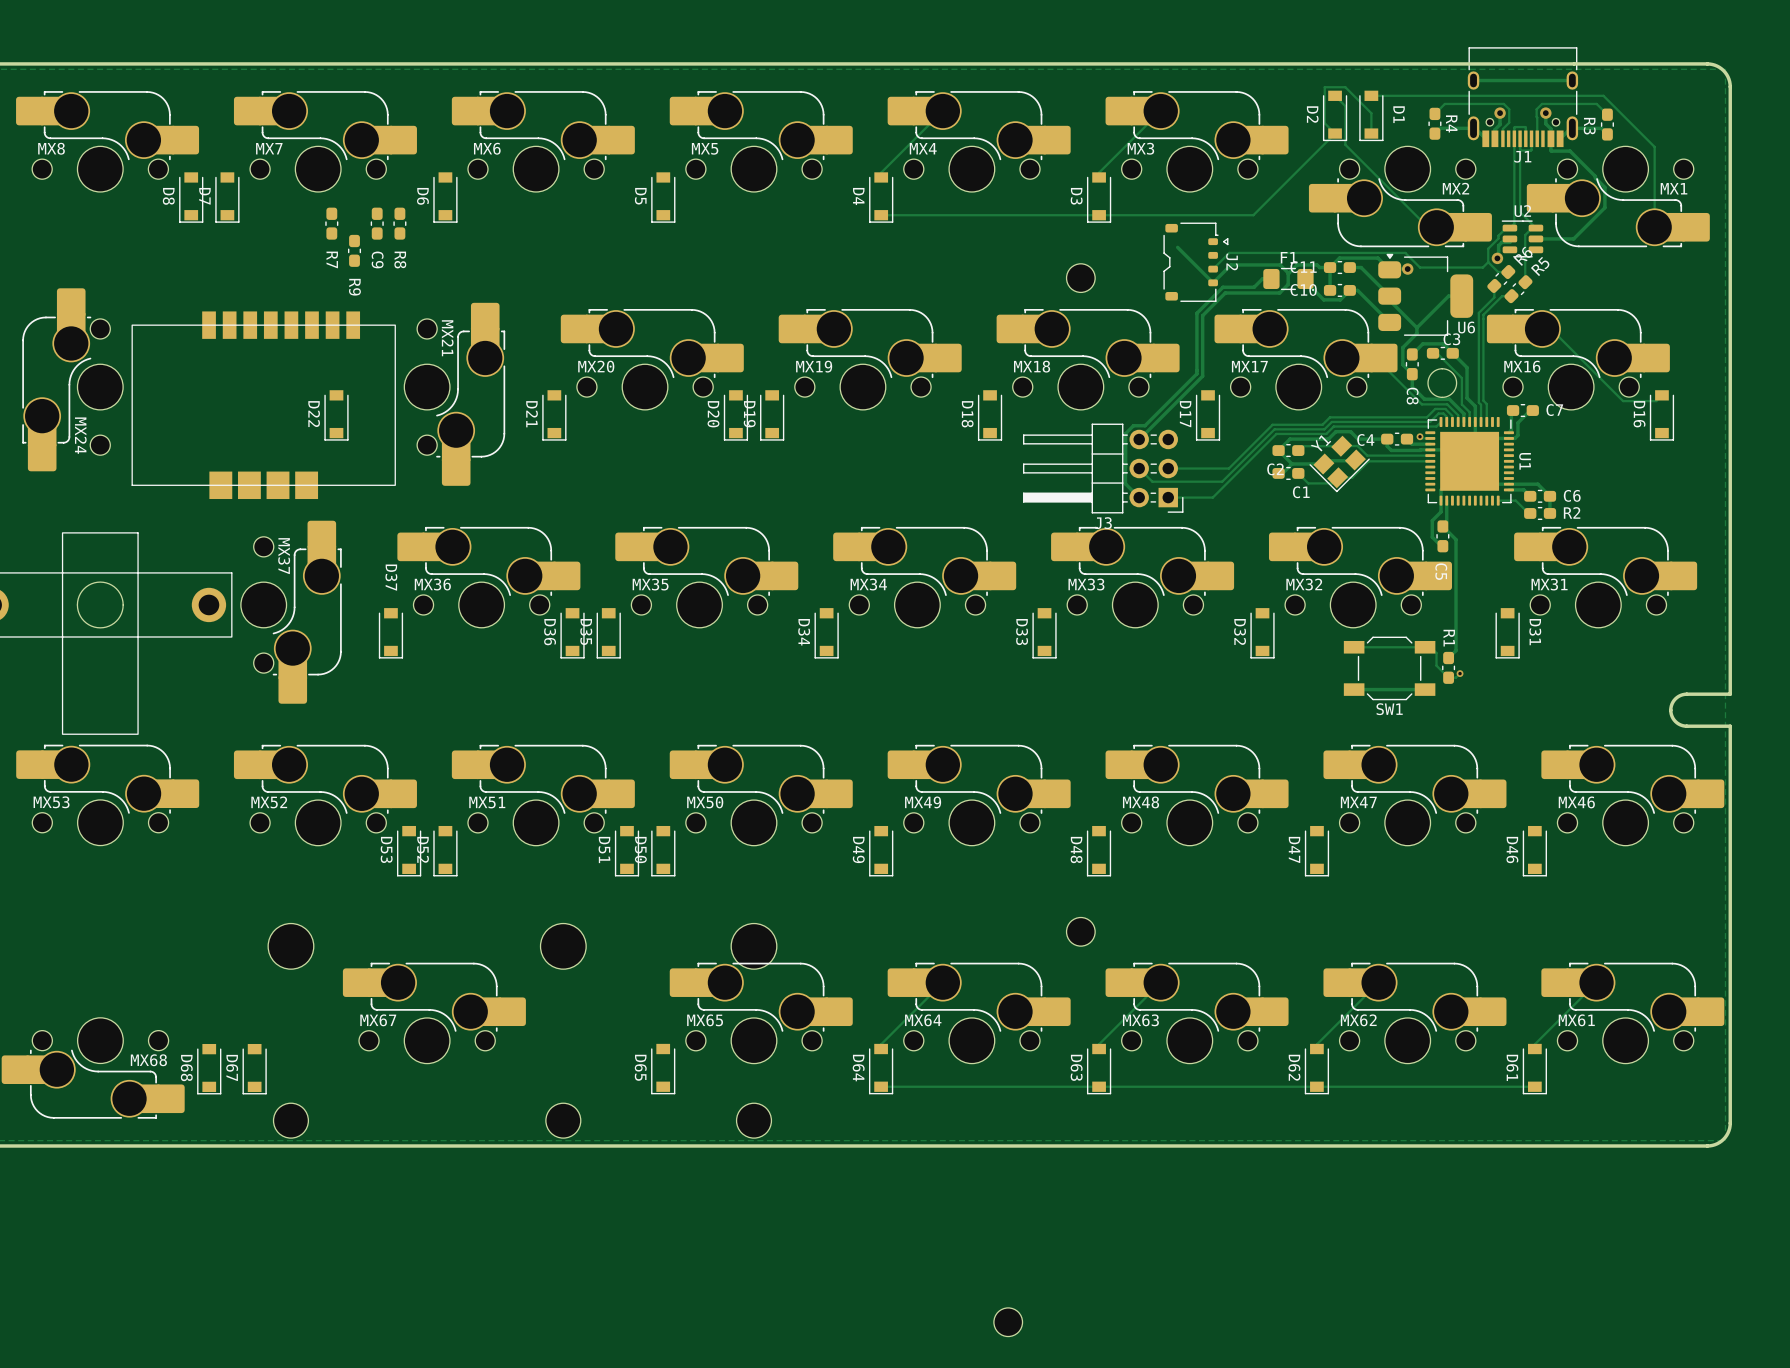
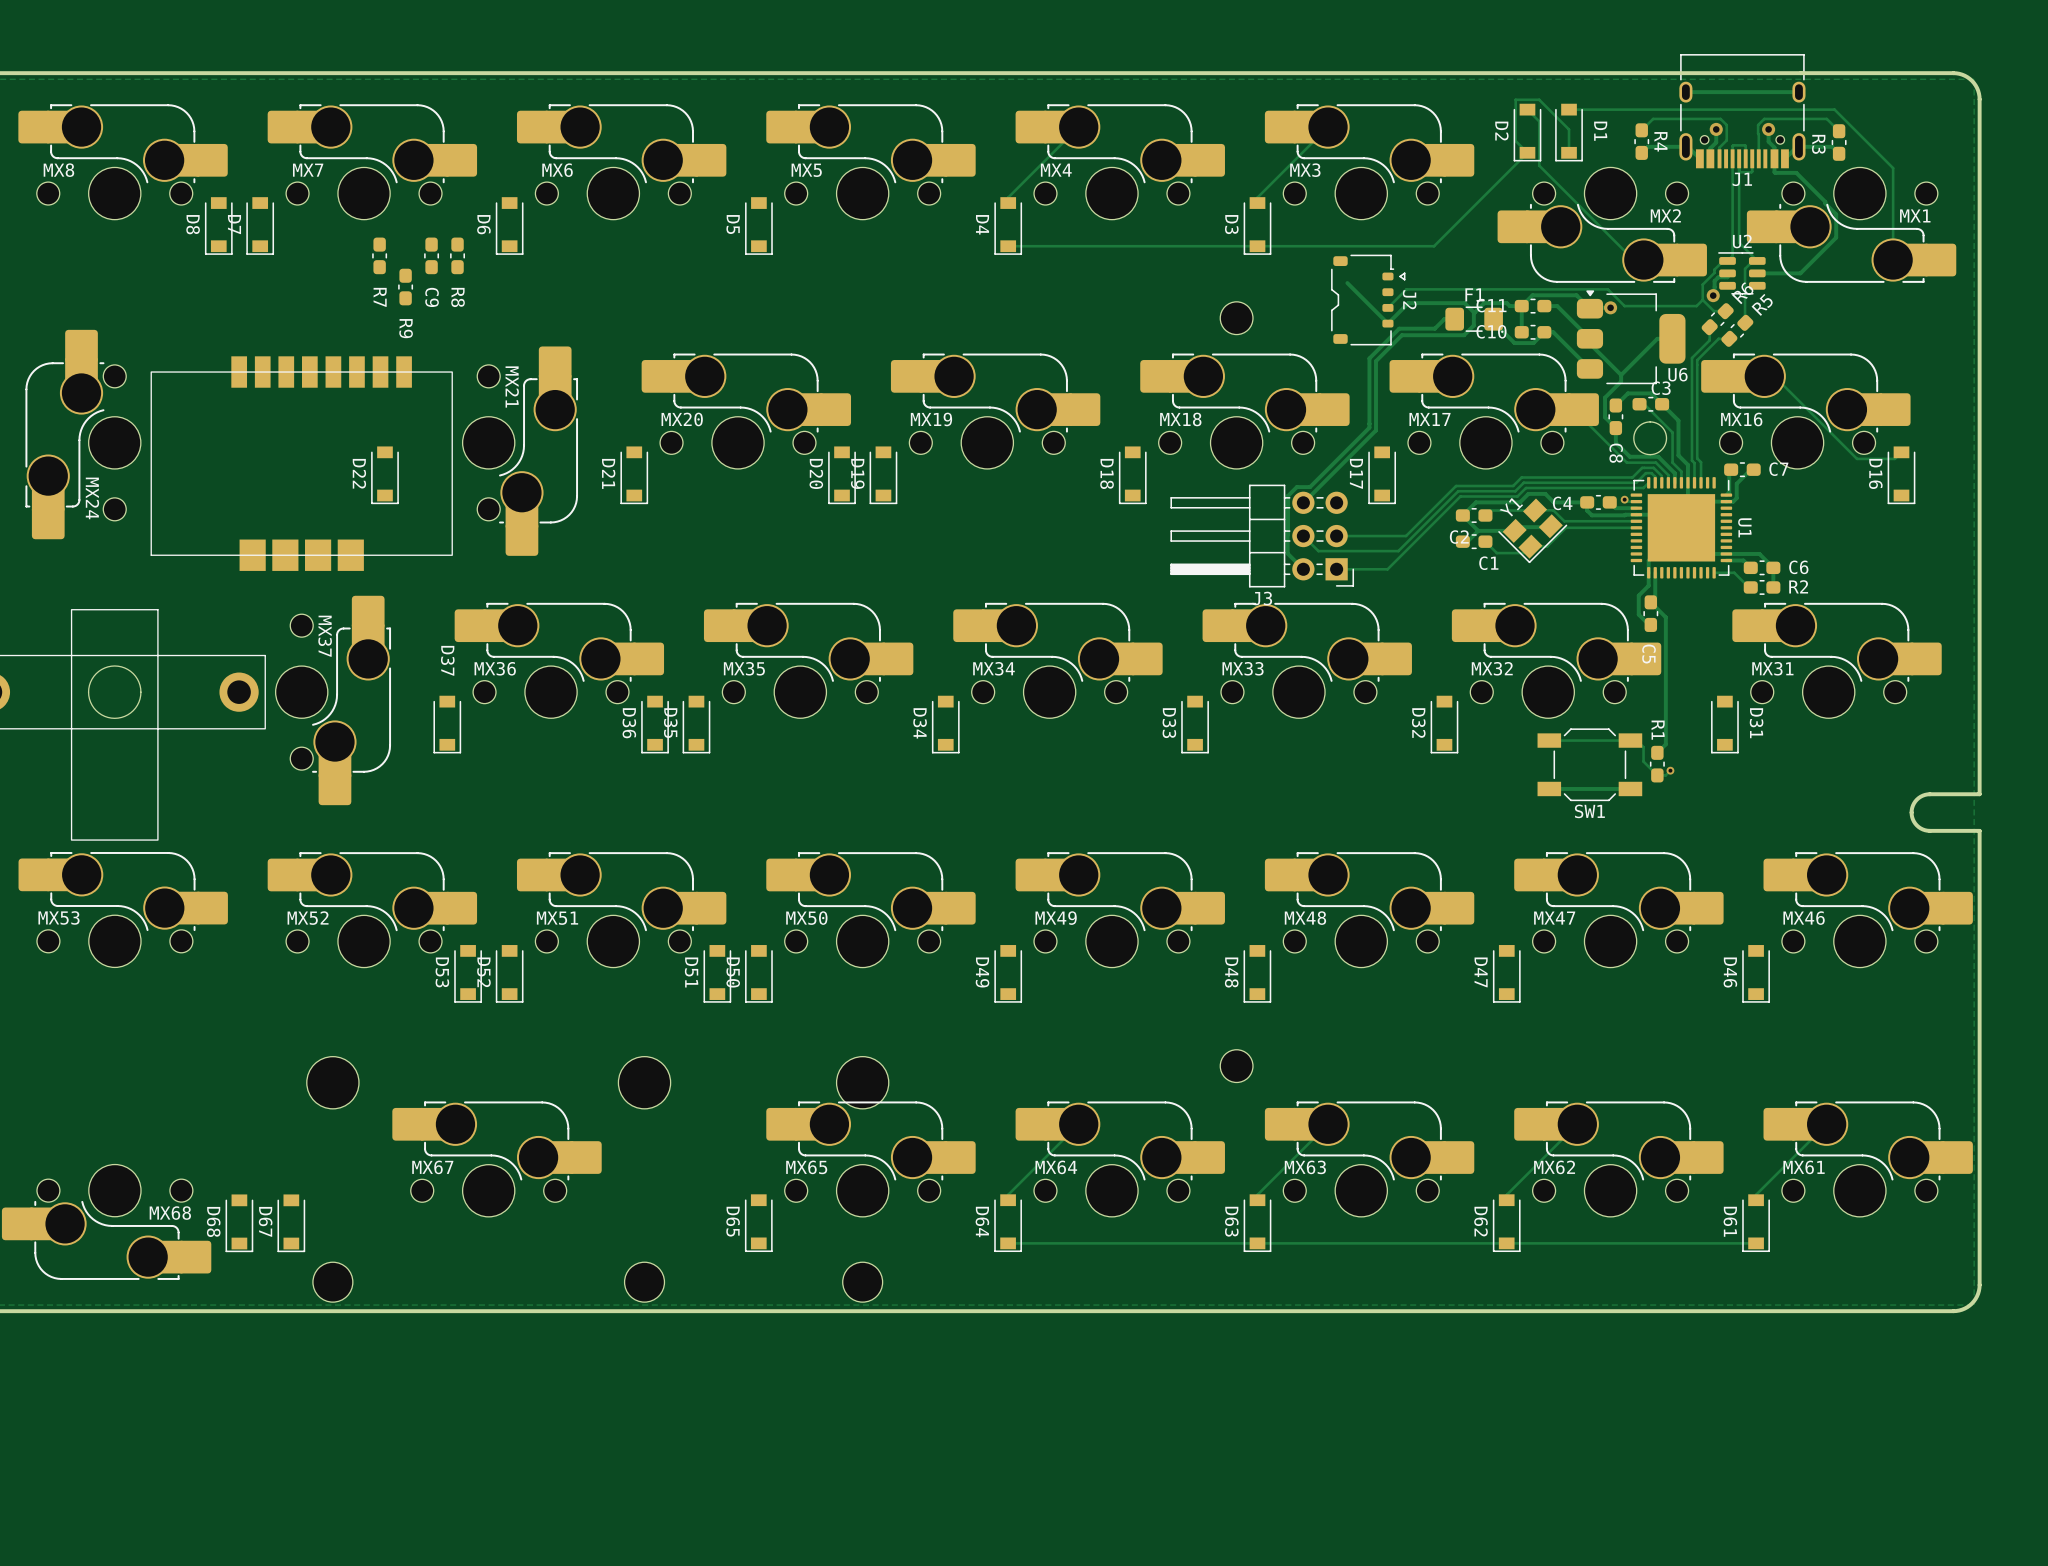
part: (1008, 1322) -> none

